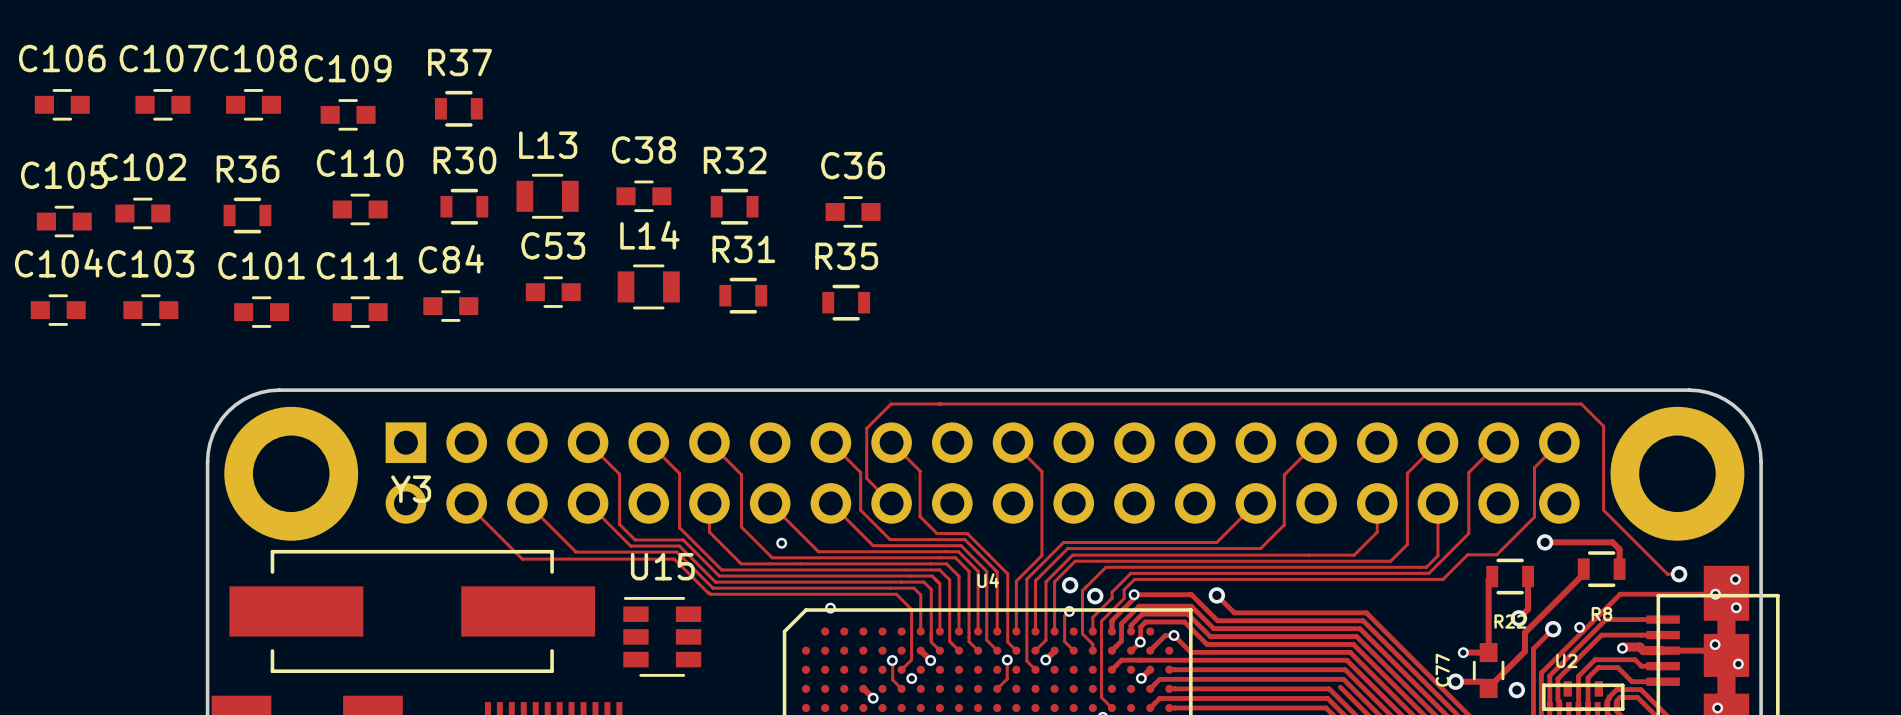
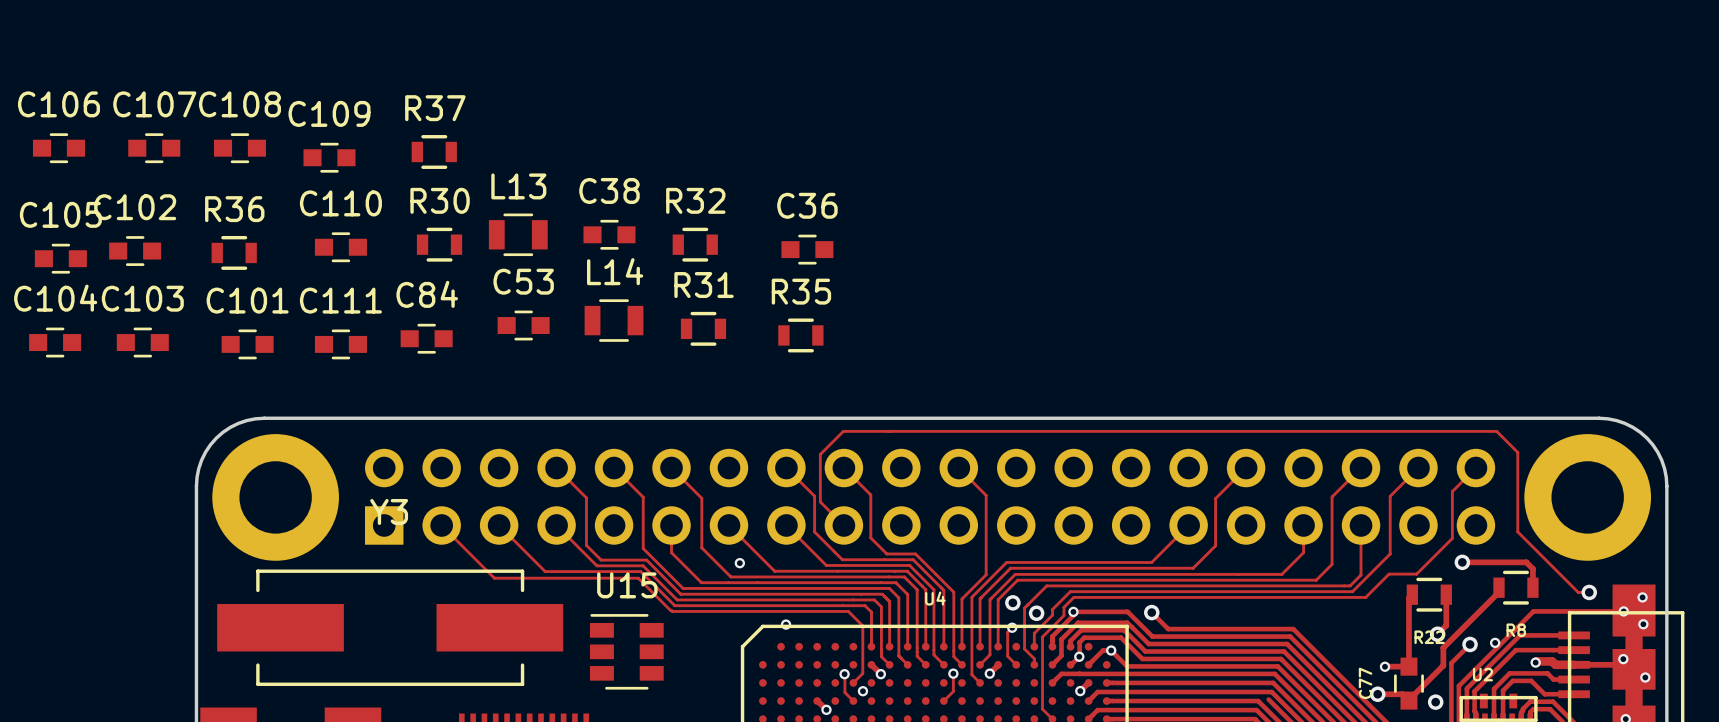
part footprint: [385, 422, 1580, 524] -> [364, 448, 1496, 545]

